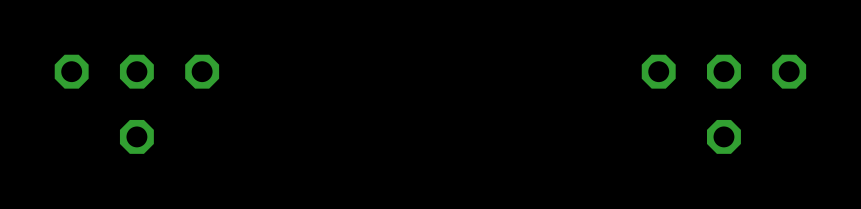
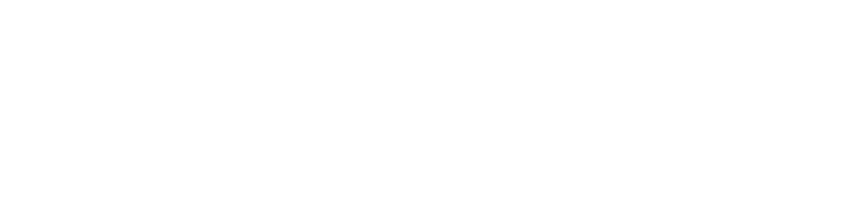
part: (136, 104) -> none
part: (723, 104) -> none

